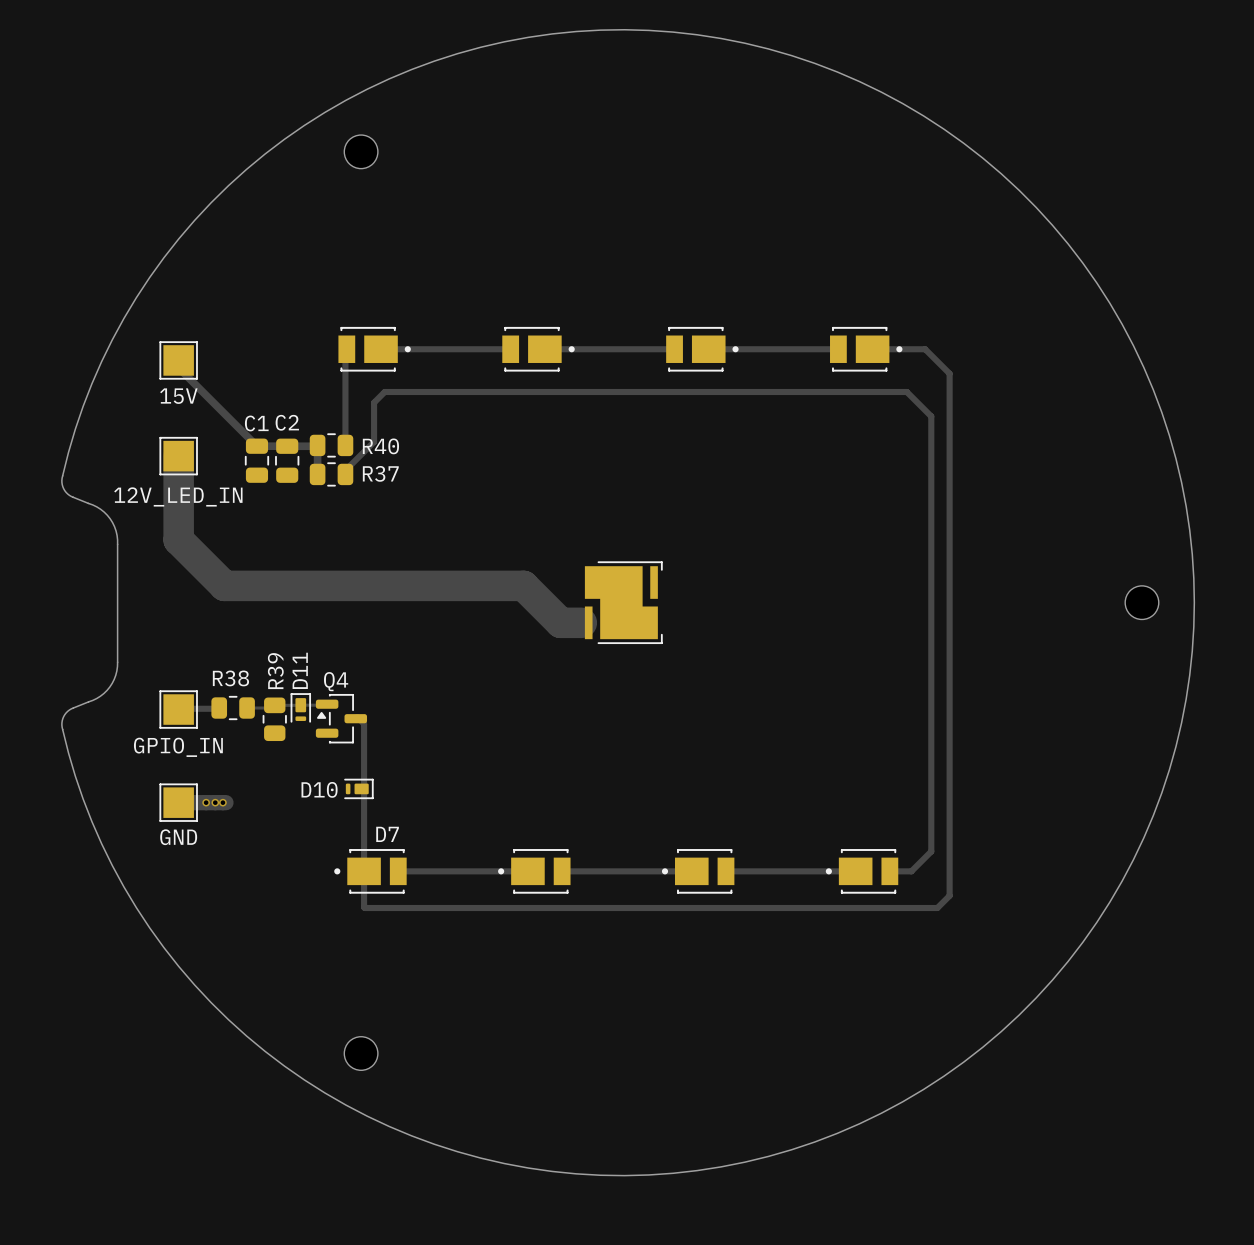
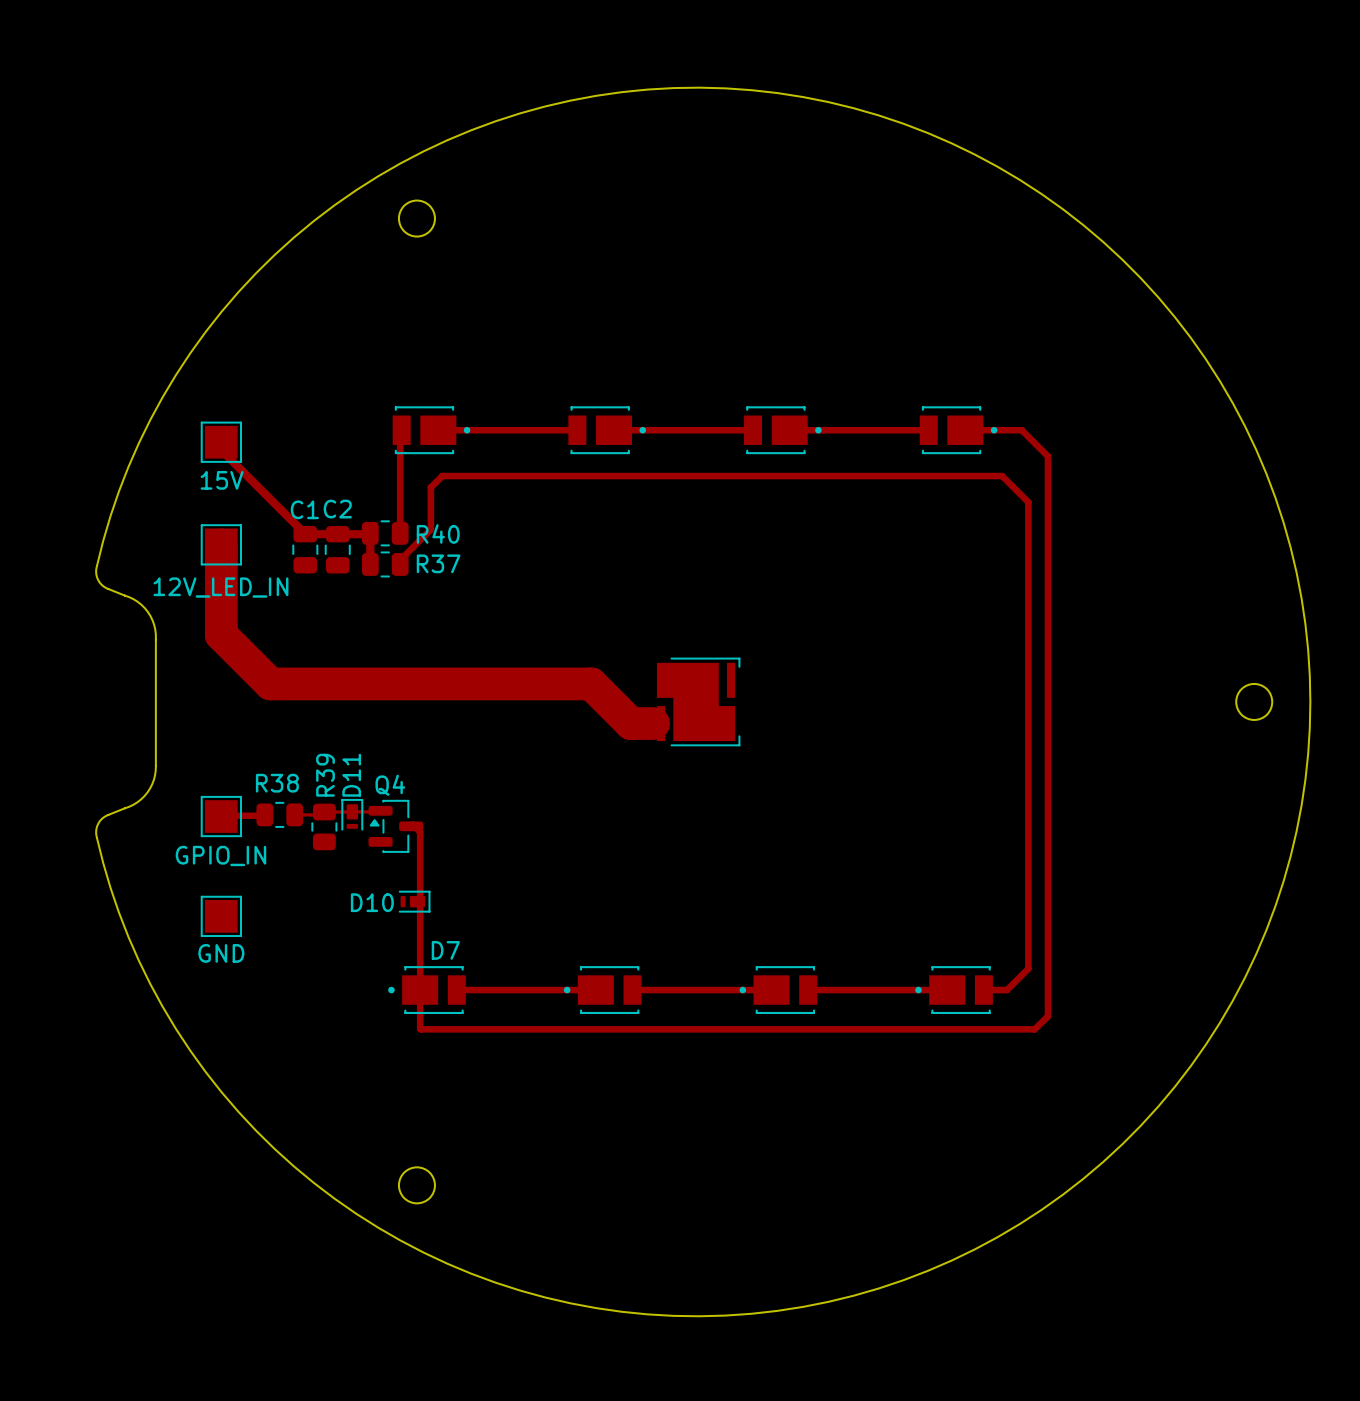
track: (178, 802) (225, 802) -> none
via: (206, 802) -> none
via: (215, 802) -> none
via: (222, 802) -> none

